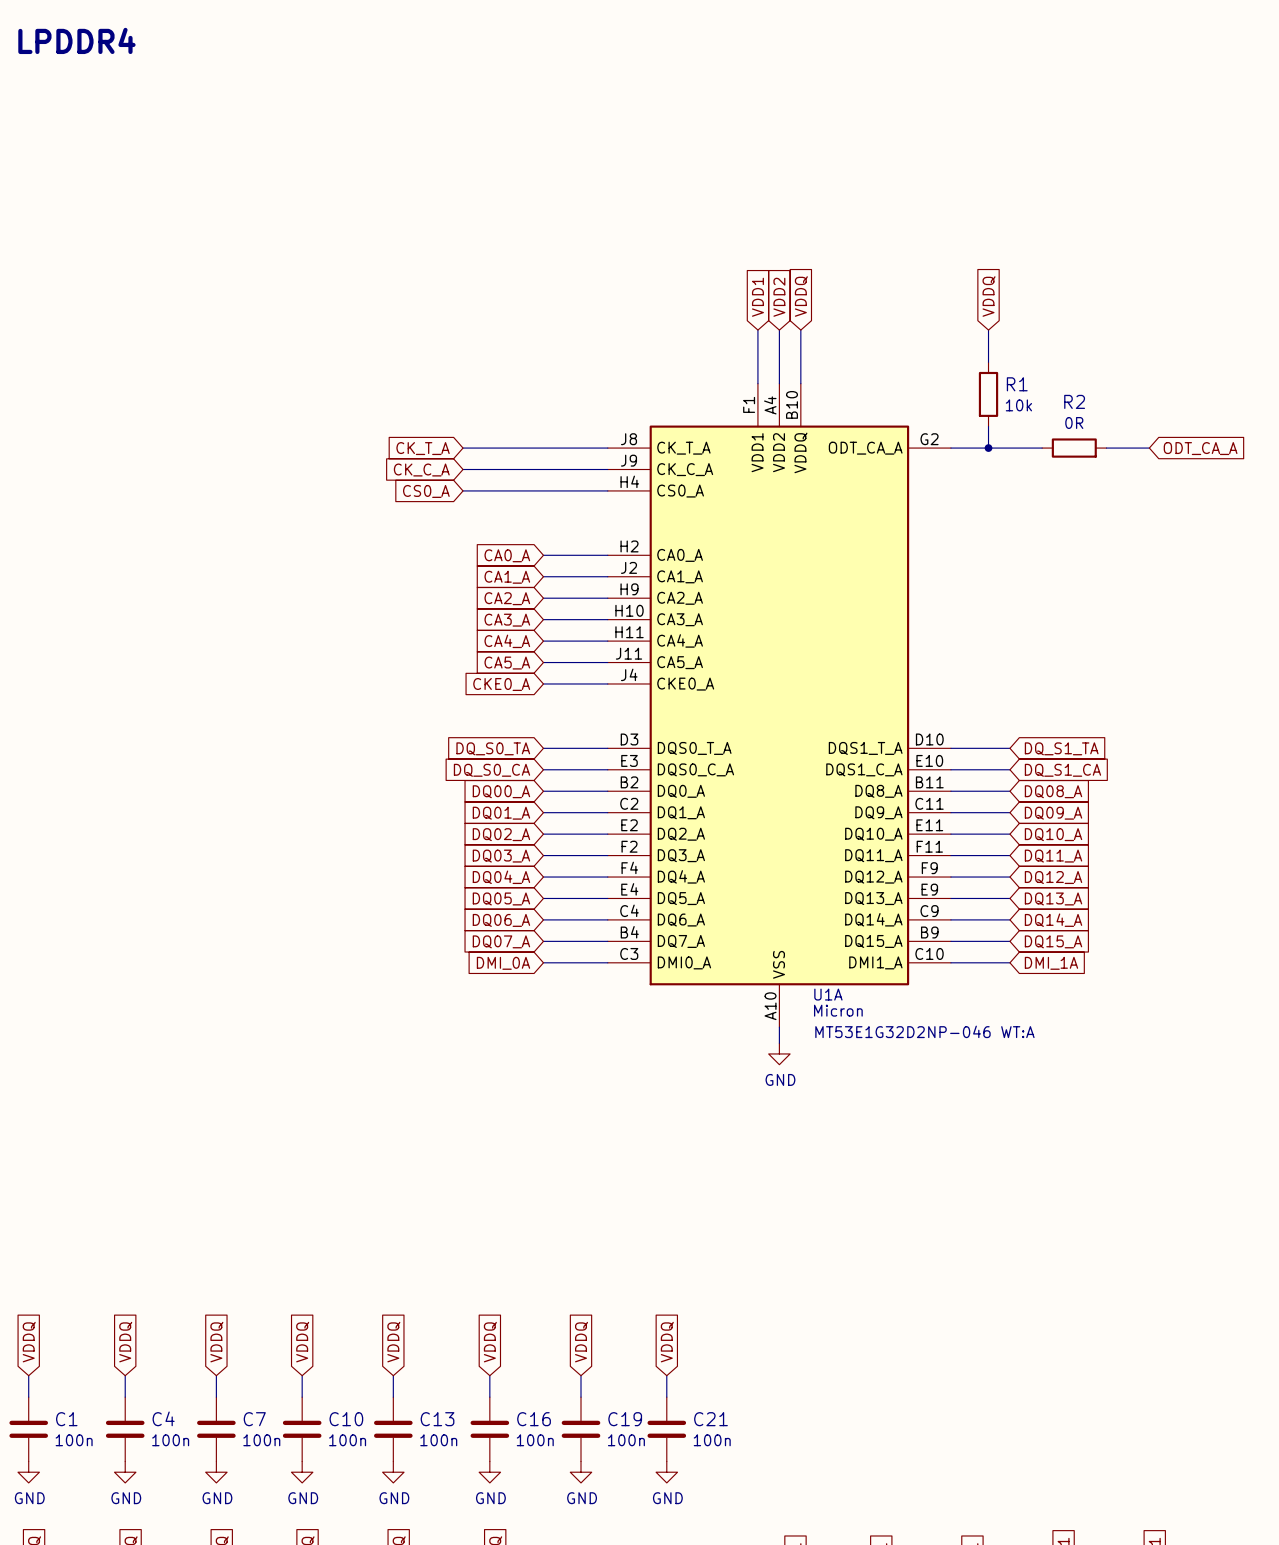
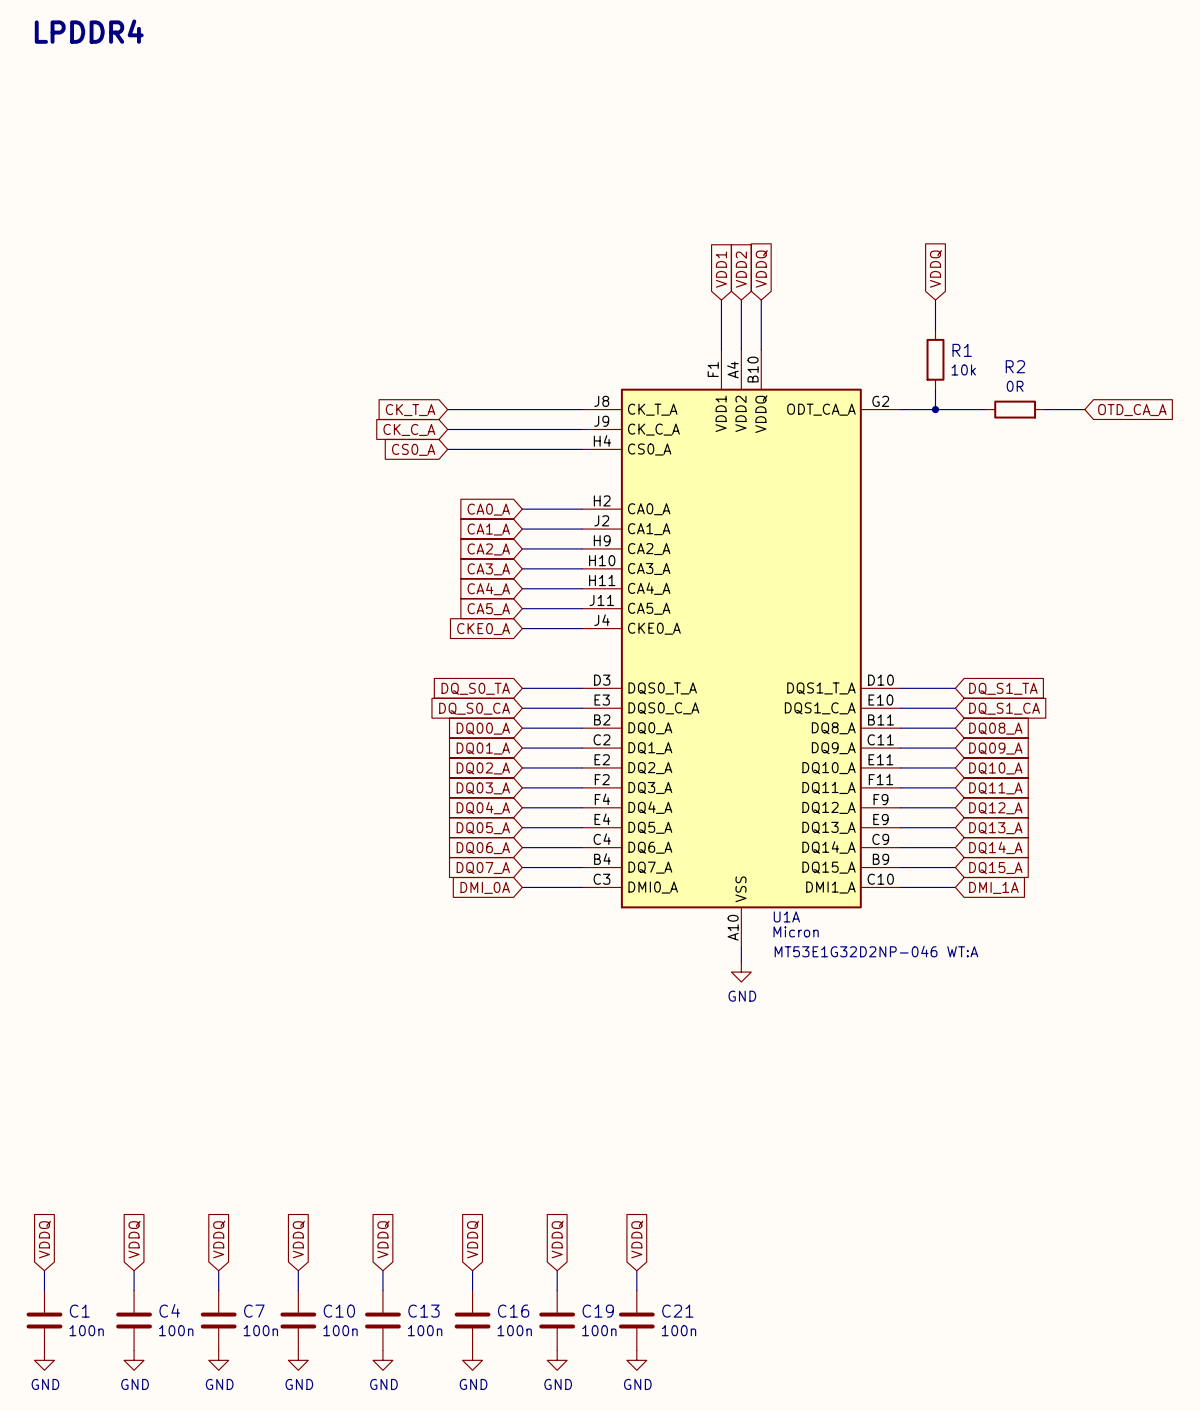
global label: ODT_CA_A (1200, 448) -> OTD_CA_A (1132, 410)

